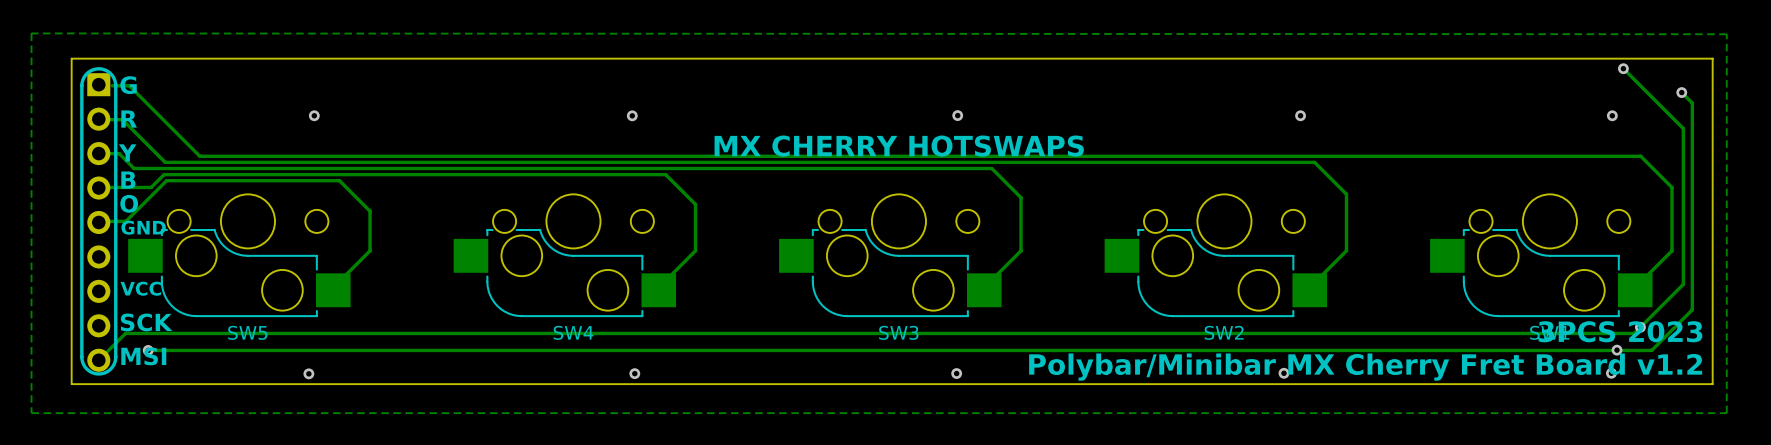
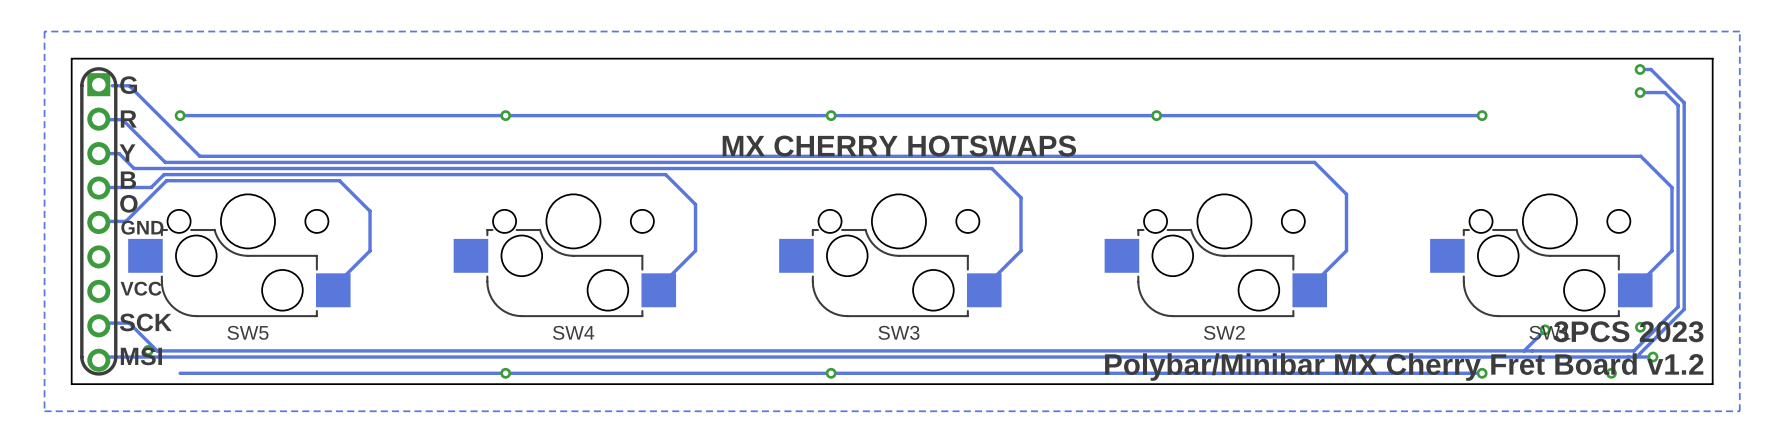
zone outline: (31, 33) (1726, 34) (1726, 413) (31, 413) (31, 33) -> (1739, 31) (1739, 411) (44, 411) (44, 31) (1739, 31)
track: (1623, 68) (1683, 128) (1683, 284) (1634, 333) (125, 333) (98, 360) -> none
via: (1623, 68) -> none
track: none -> (1640, 69) (1650, 69) (1684, 102) (1684, 309) (1636, 357)
via: none -> (1640, 69)
track: none -> (1640, 92) (1665, 92) (1678, 105) (1678, 306) (1634, 350) (157, 350) (129, 323) (98, 323)
via: none -> (1640, 92)
track: (1681, 92) (1692, 103) (1692, 309) (1651, 350) (148, 350) -> none
via: (1681, 92) -> none
via: none -> (180, 115)
via: (314, 115) -> none
via: none -> (505, 115)
via: (632, 115) -> none
via: none -> (831, 115)
via: (957, 115) -> none
via: none -> (1156, 115)
via: (1300, 115) -> none
track: none -> (1482, 115) (180, 115)
via: none -> (1482, 115)
via: (1612, 115) -> none
track: none -> (1545, 329) (1524, 350)
via: none -> (1545, 329)
via position: (1617, 350) -> (1653, 357)
track: none -> (1653, 357) (98, 357)
via: (308, 373) -> none
via: none -> (505, 373)
via: (634, 373) -> none
via: none -> (831, 373)
via: (956, 373) -> none
via: (1283, 373) -> none
track: none -> (1482, 373) (180, 373)
via: none -> (1482, 373)

